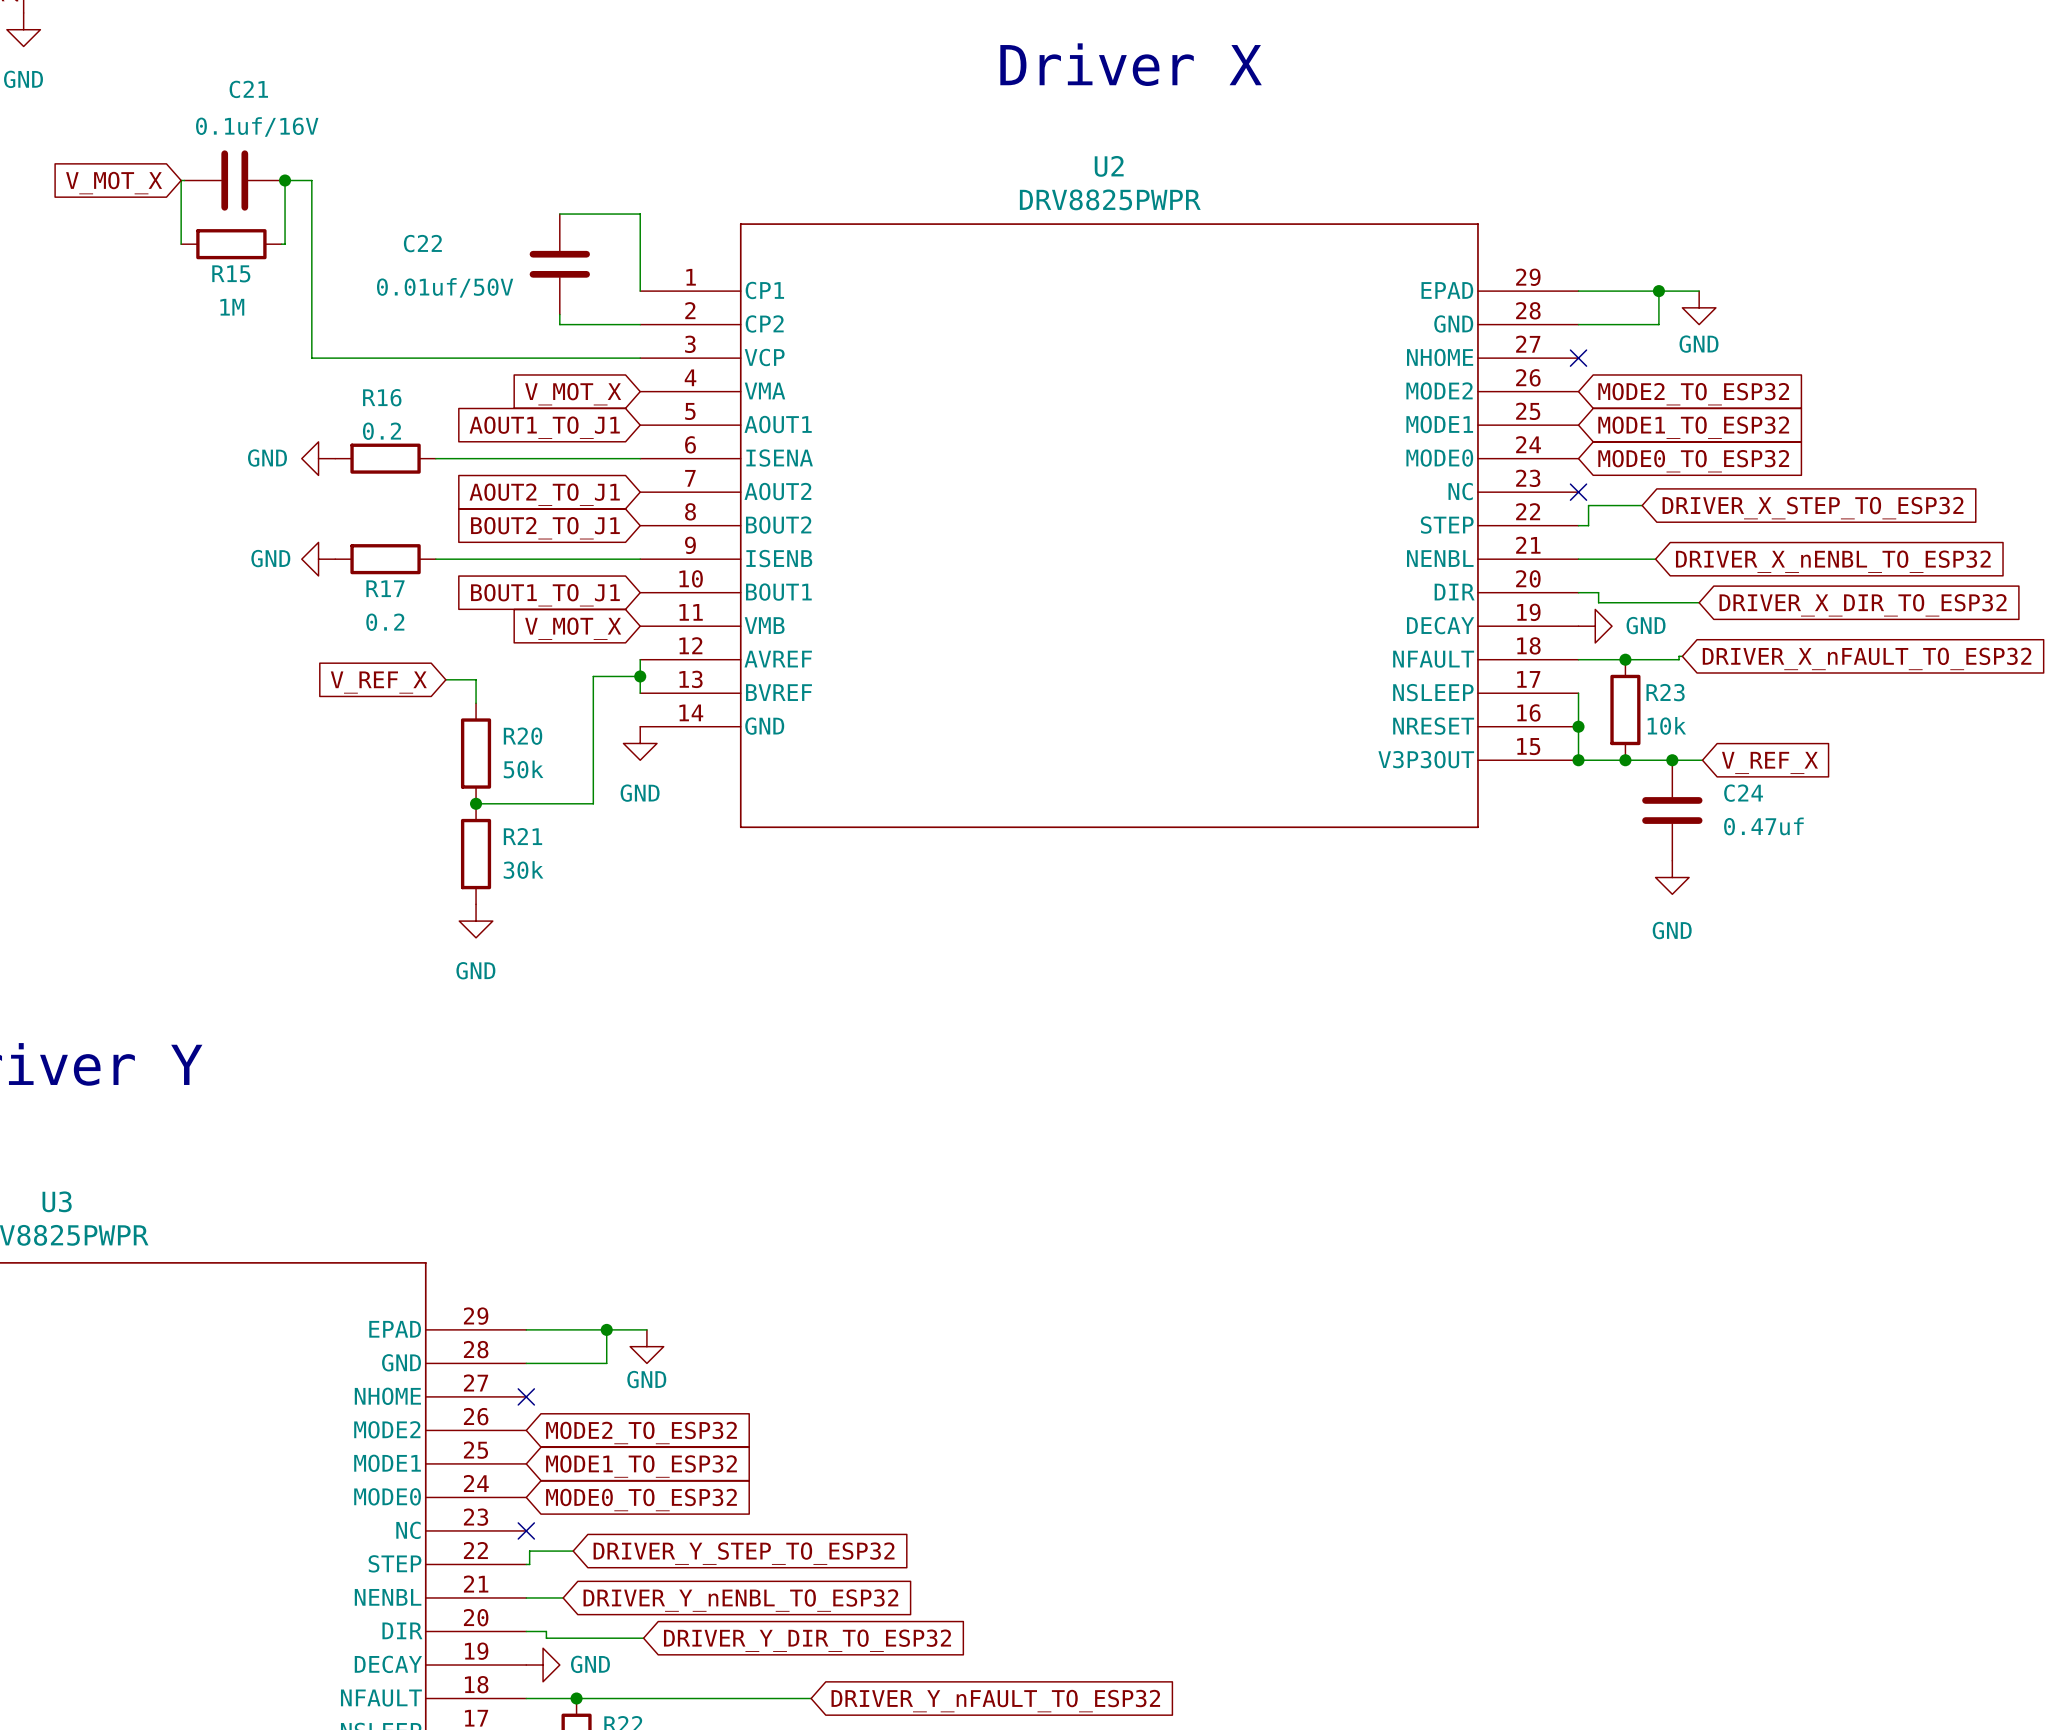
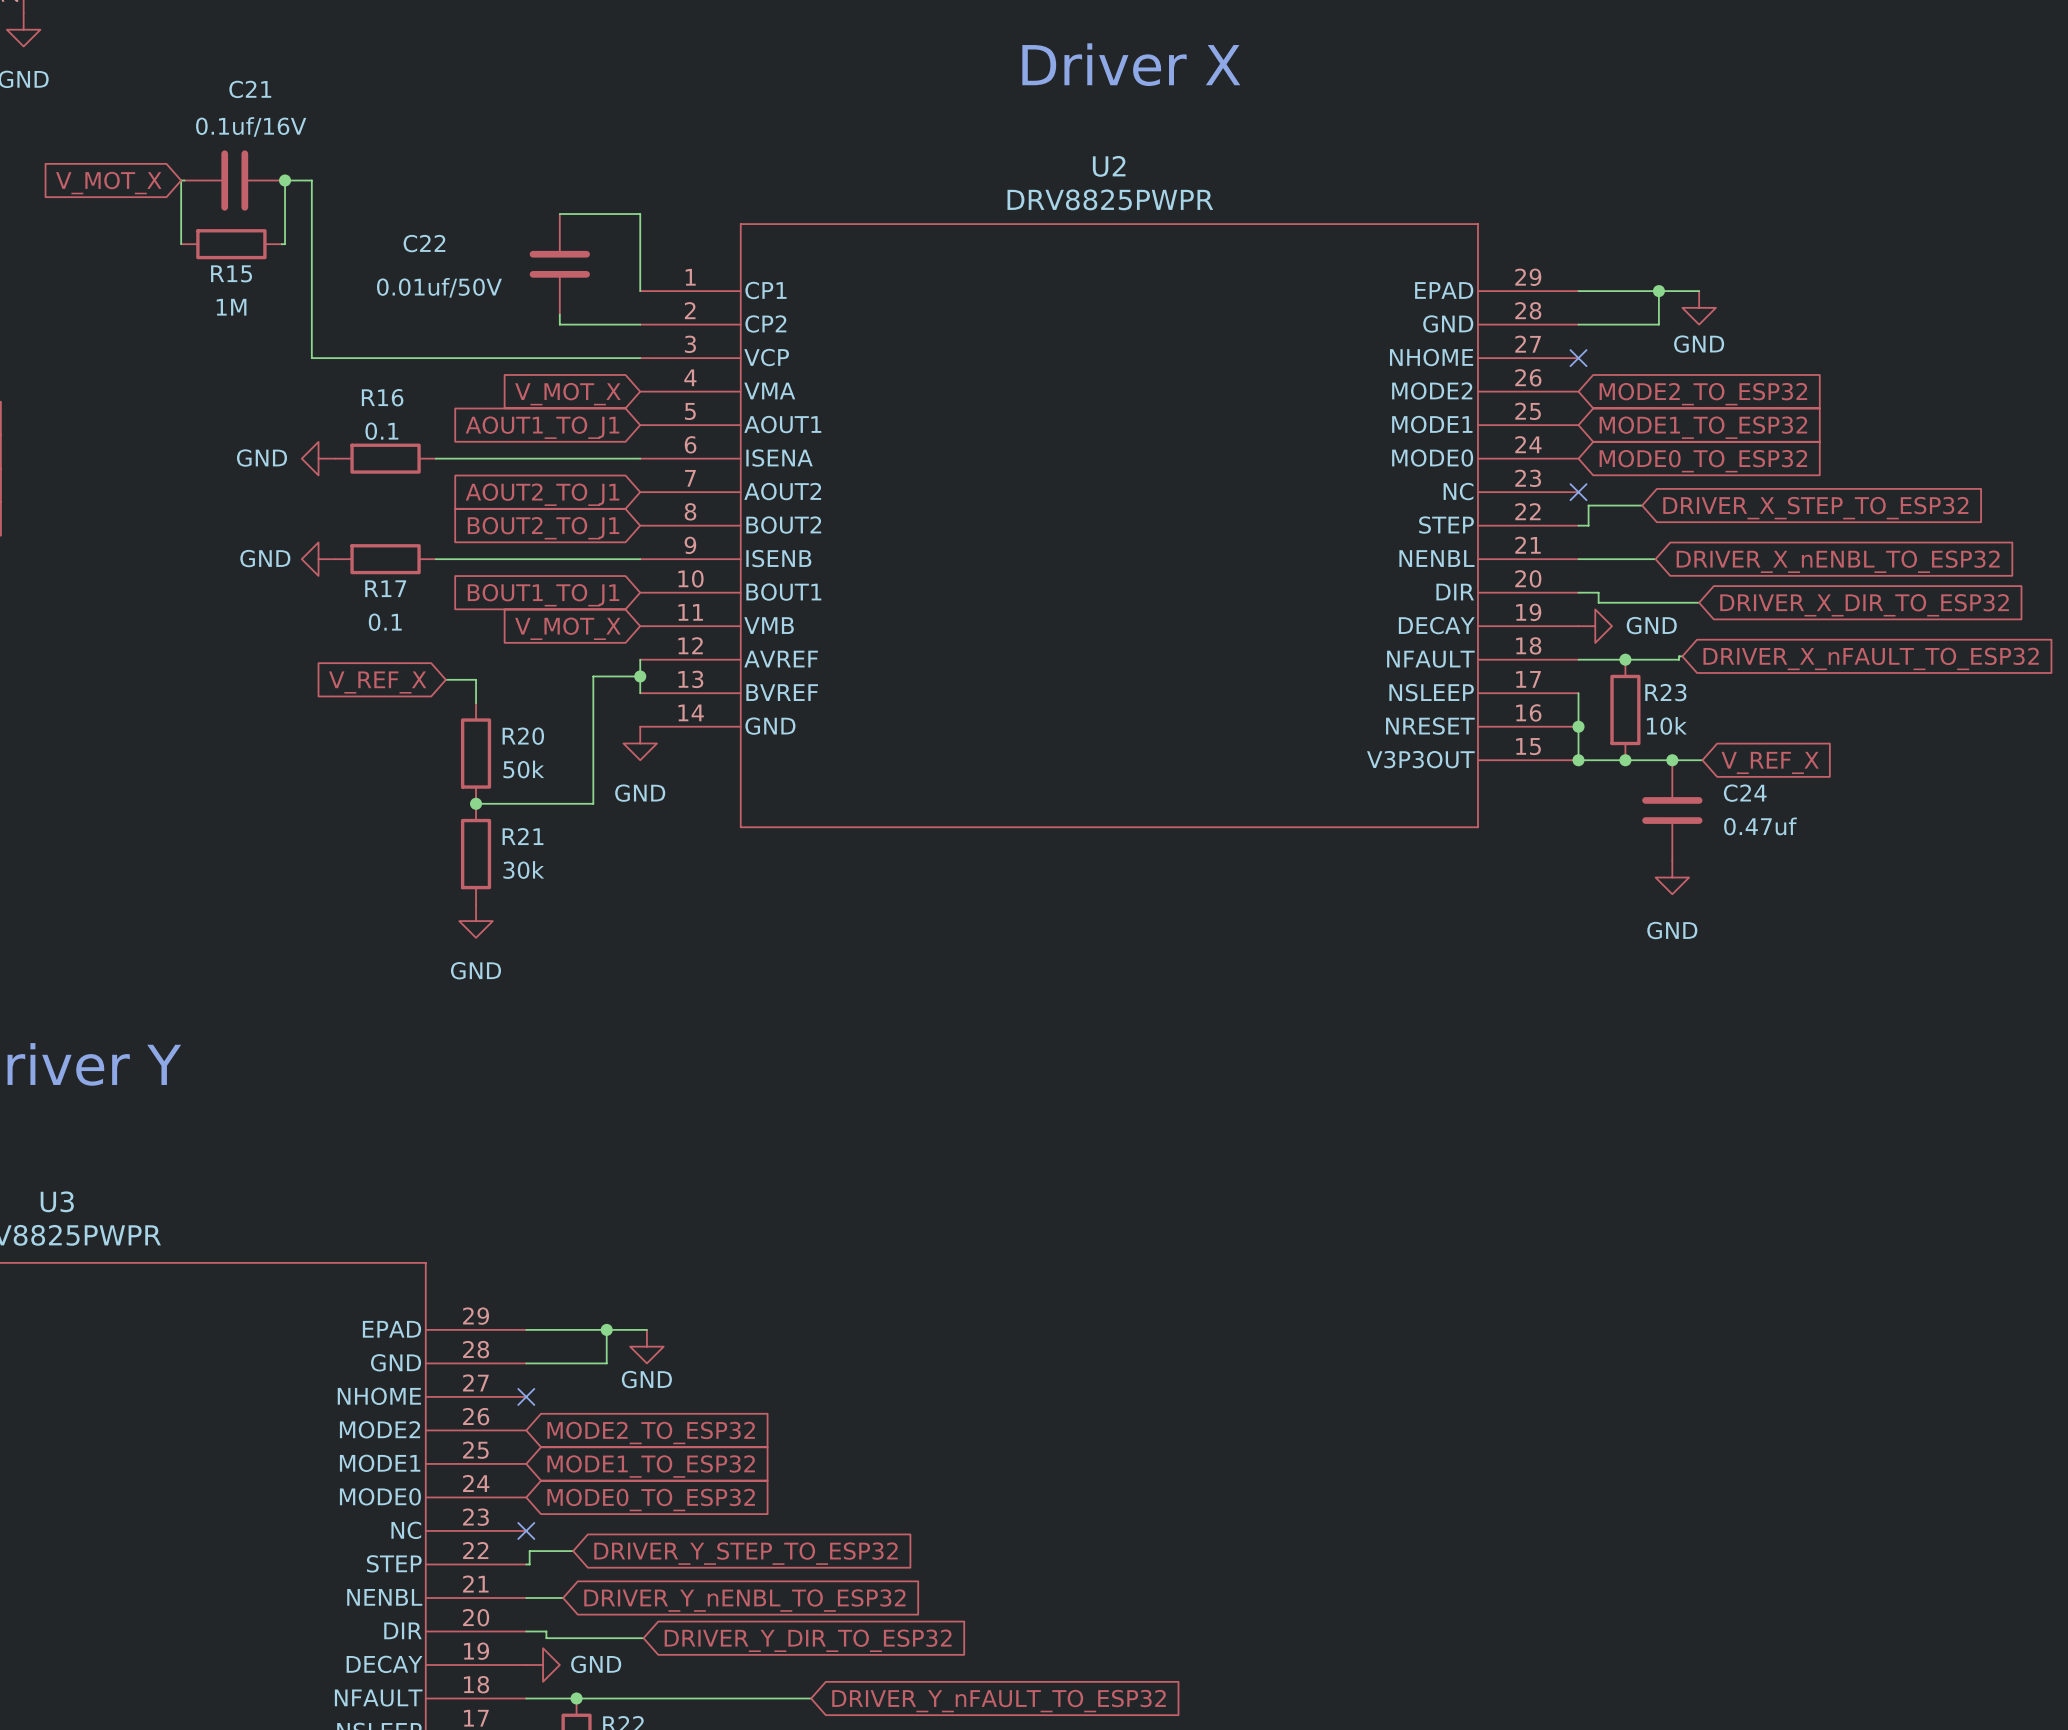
R16 value: 0.2 (381, 431) -> 0.1 (381, 431)
R17 value: 0.2 (385, 622) -> 0.1 (385, 622)

